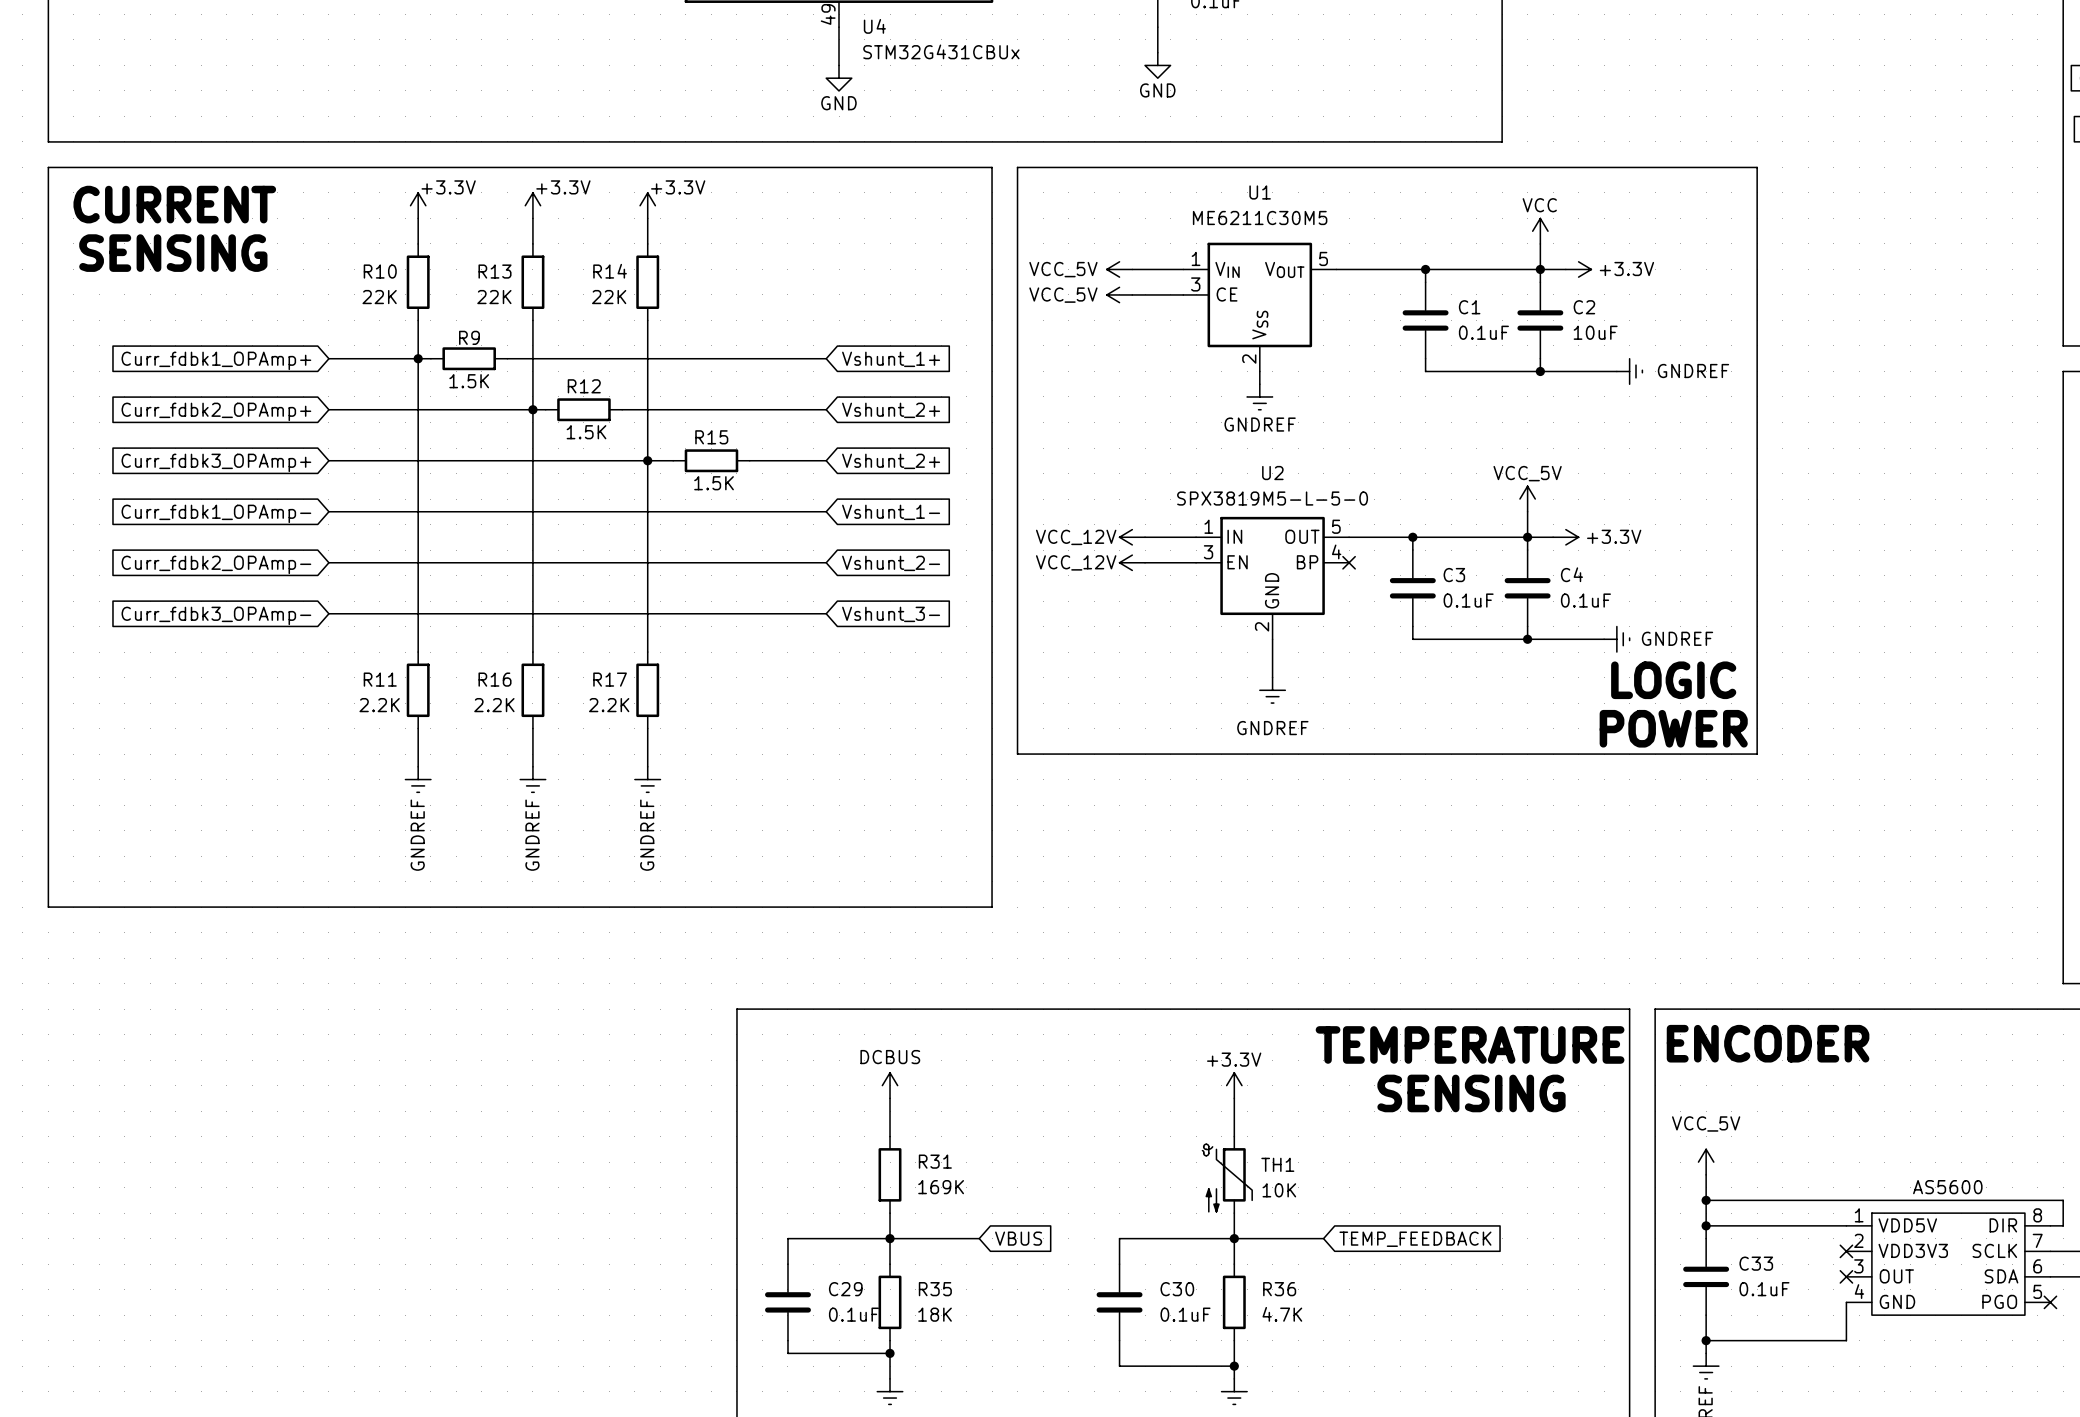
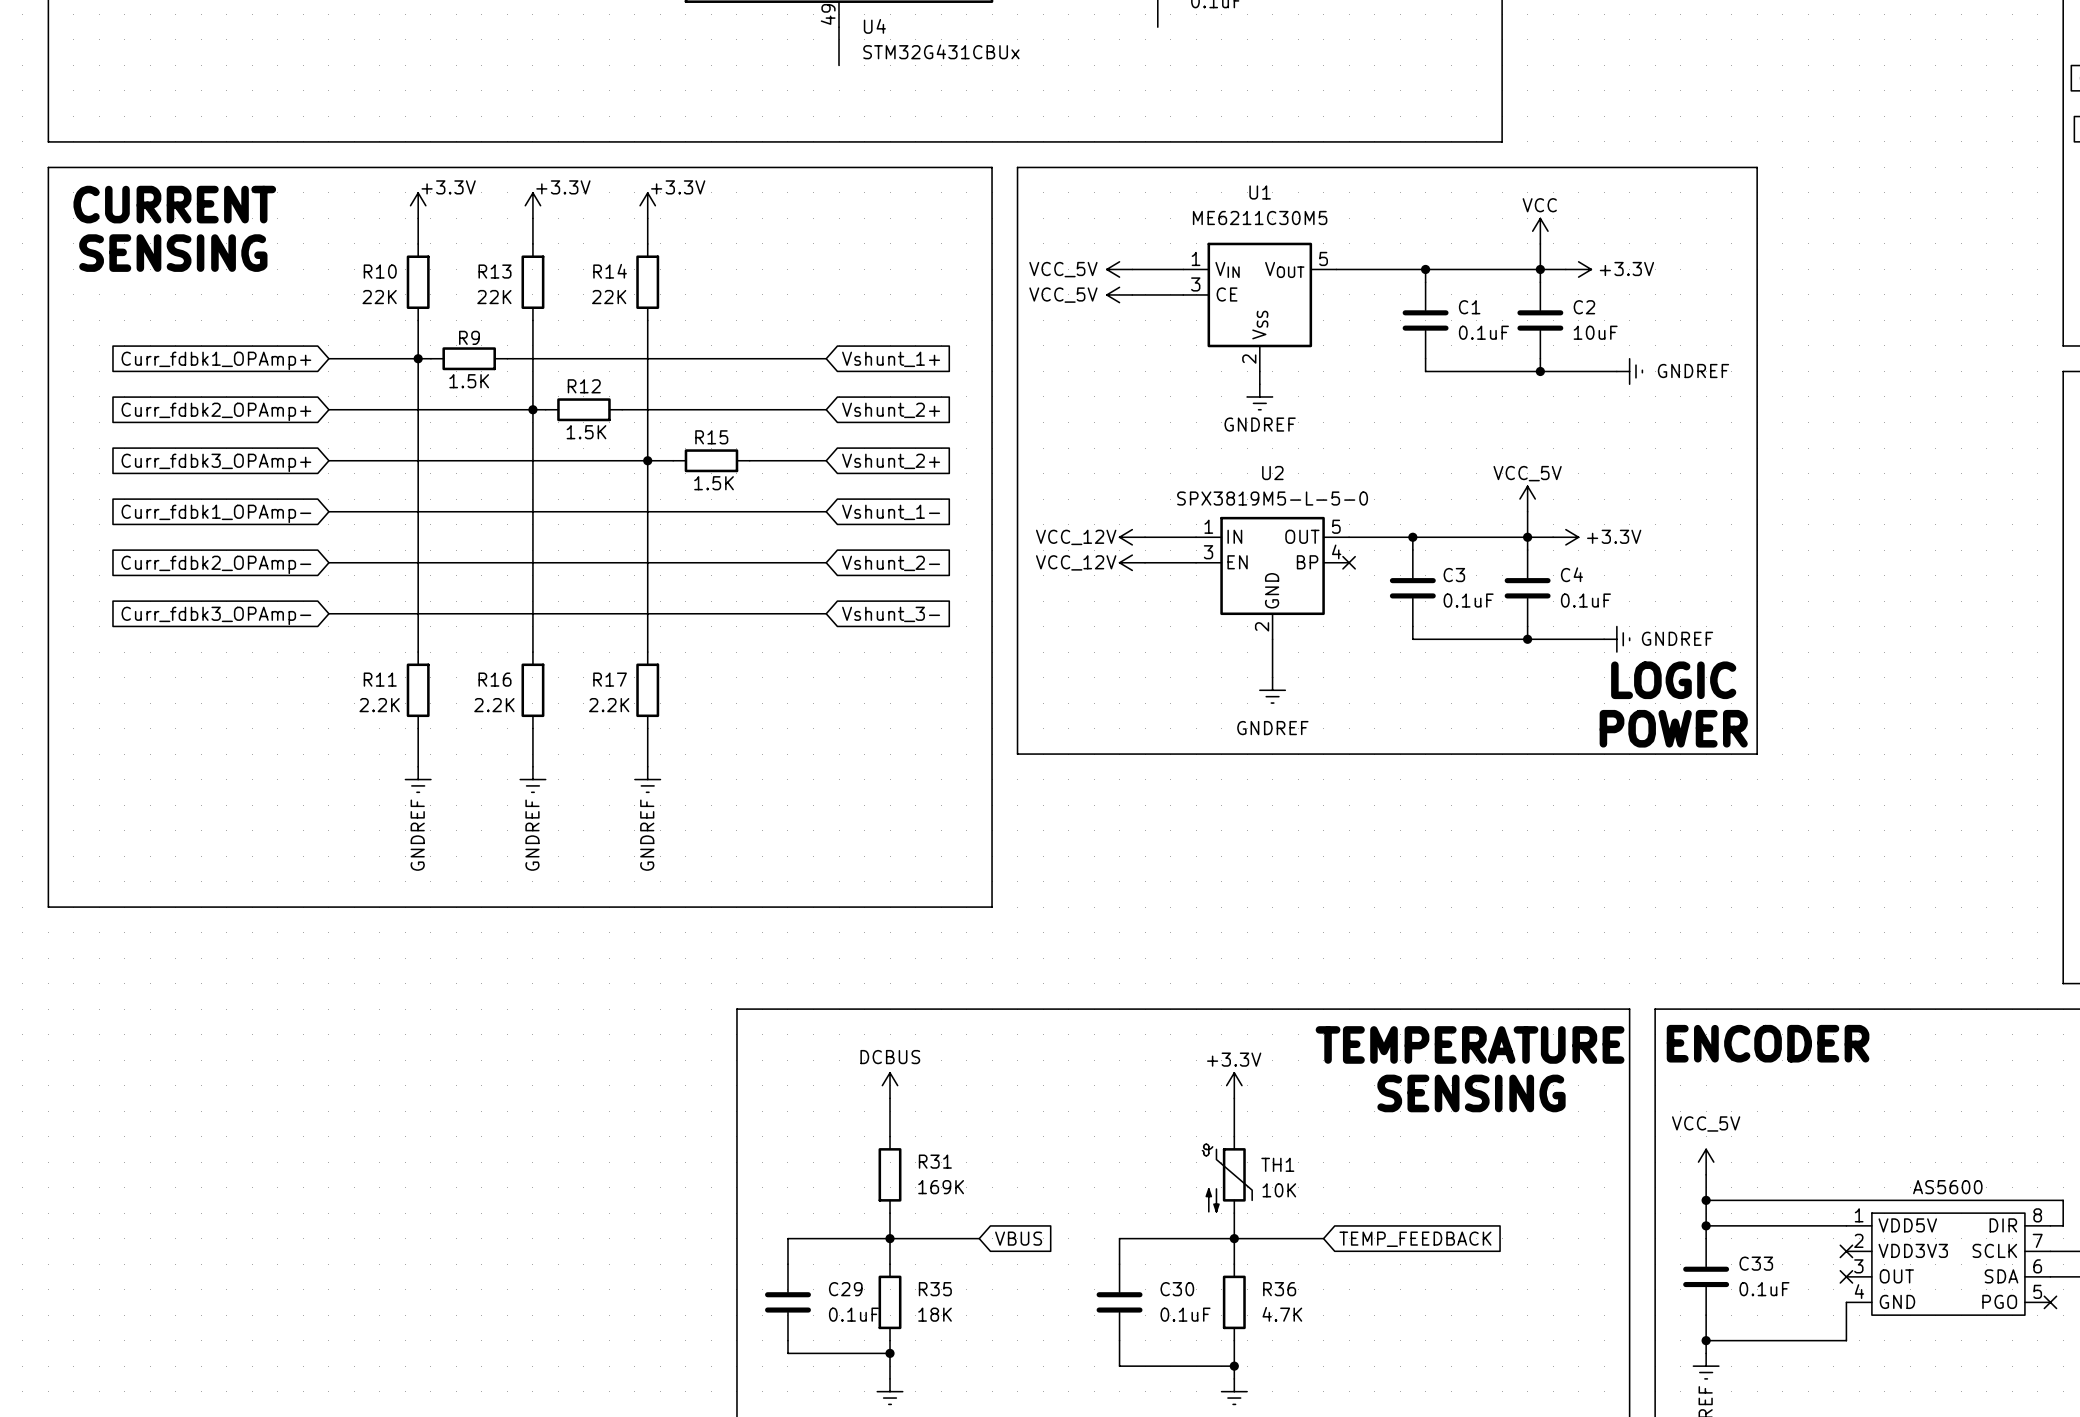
wire: (1157, 27) (1157, 52) -> none
power symbol: GND (1157, 65) -> none
power symbol: GND (839, 78) -> none

